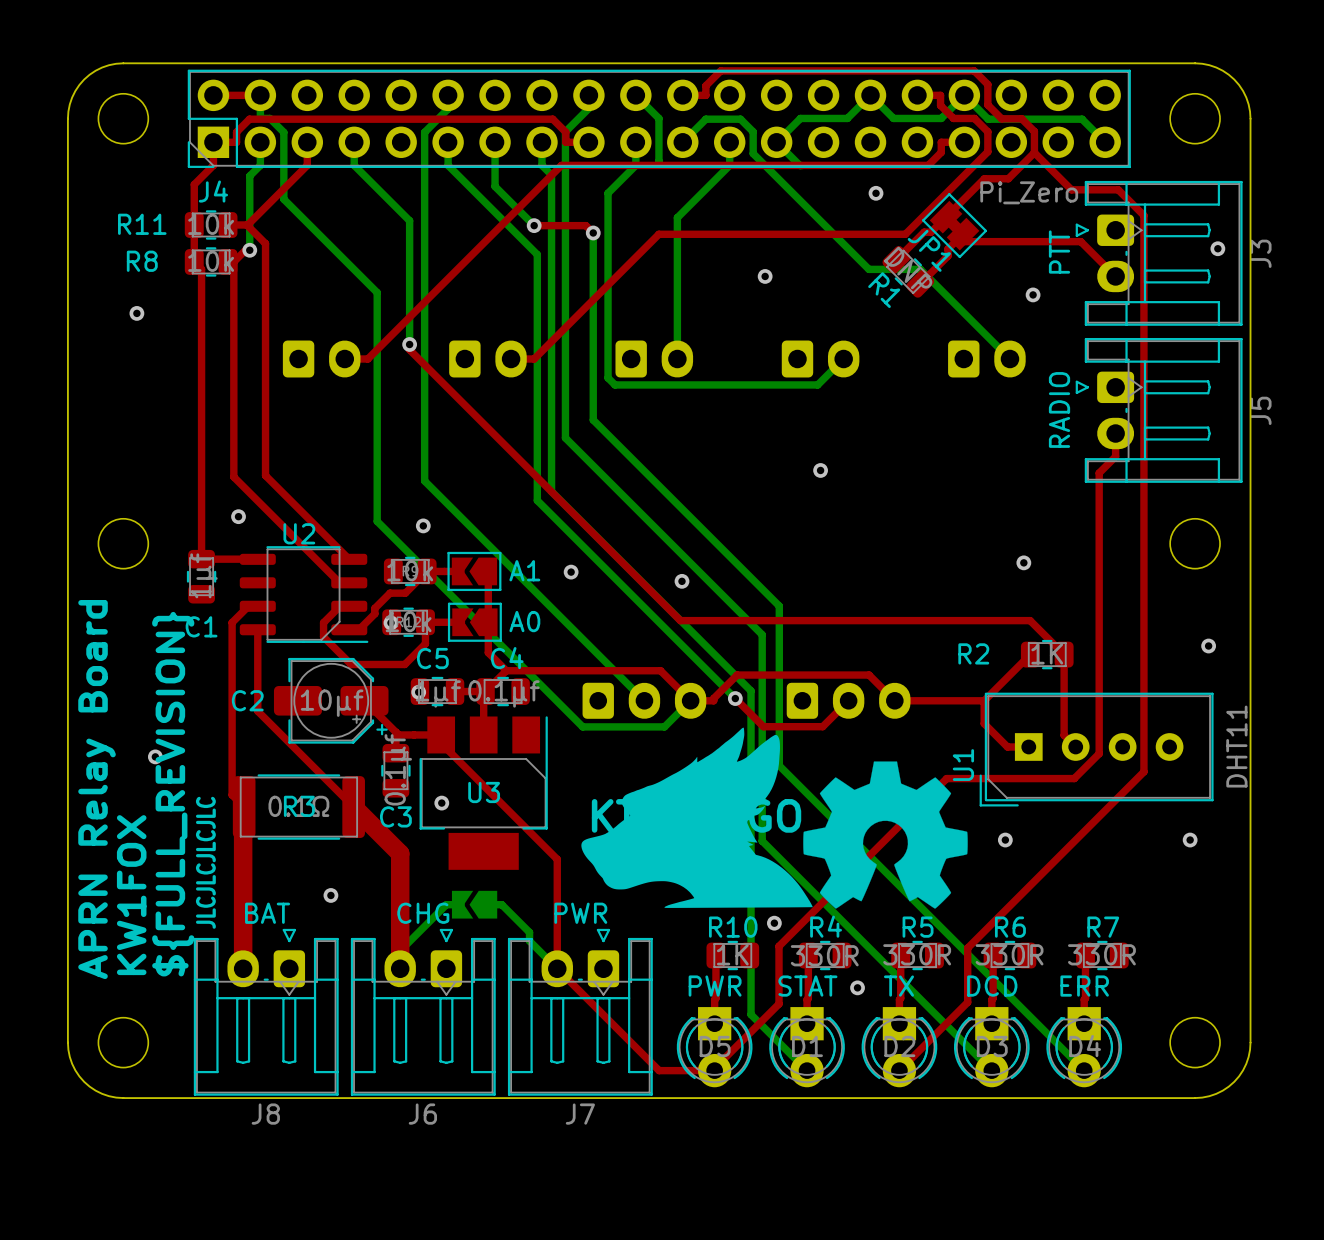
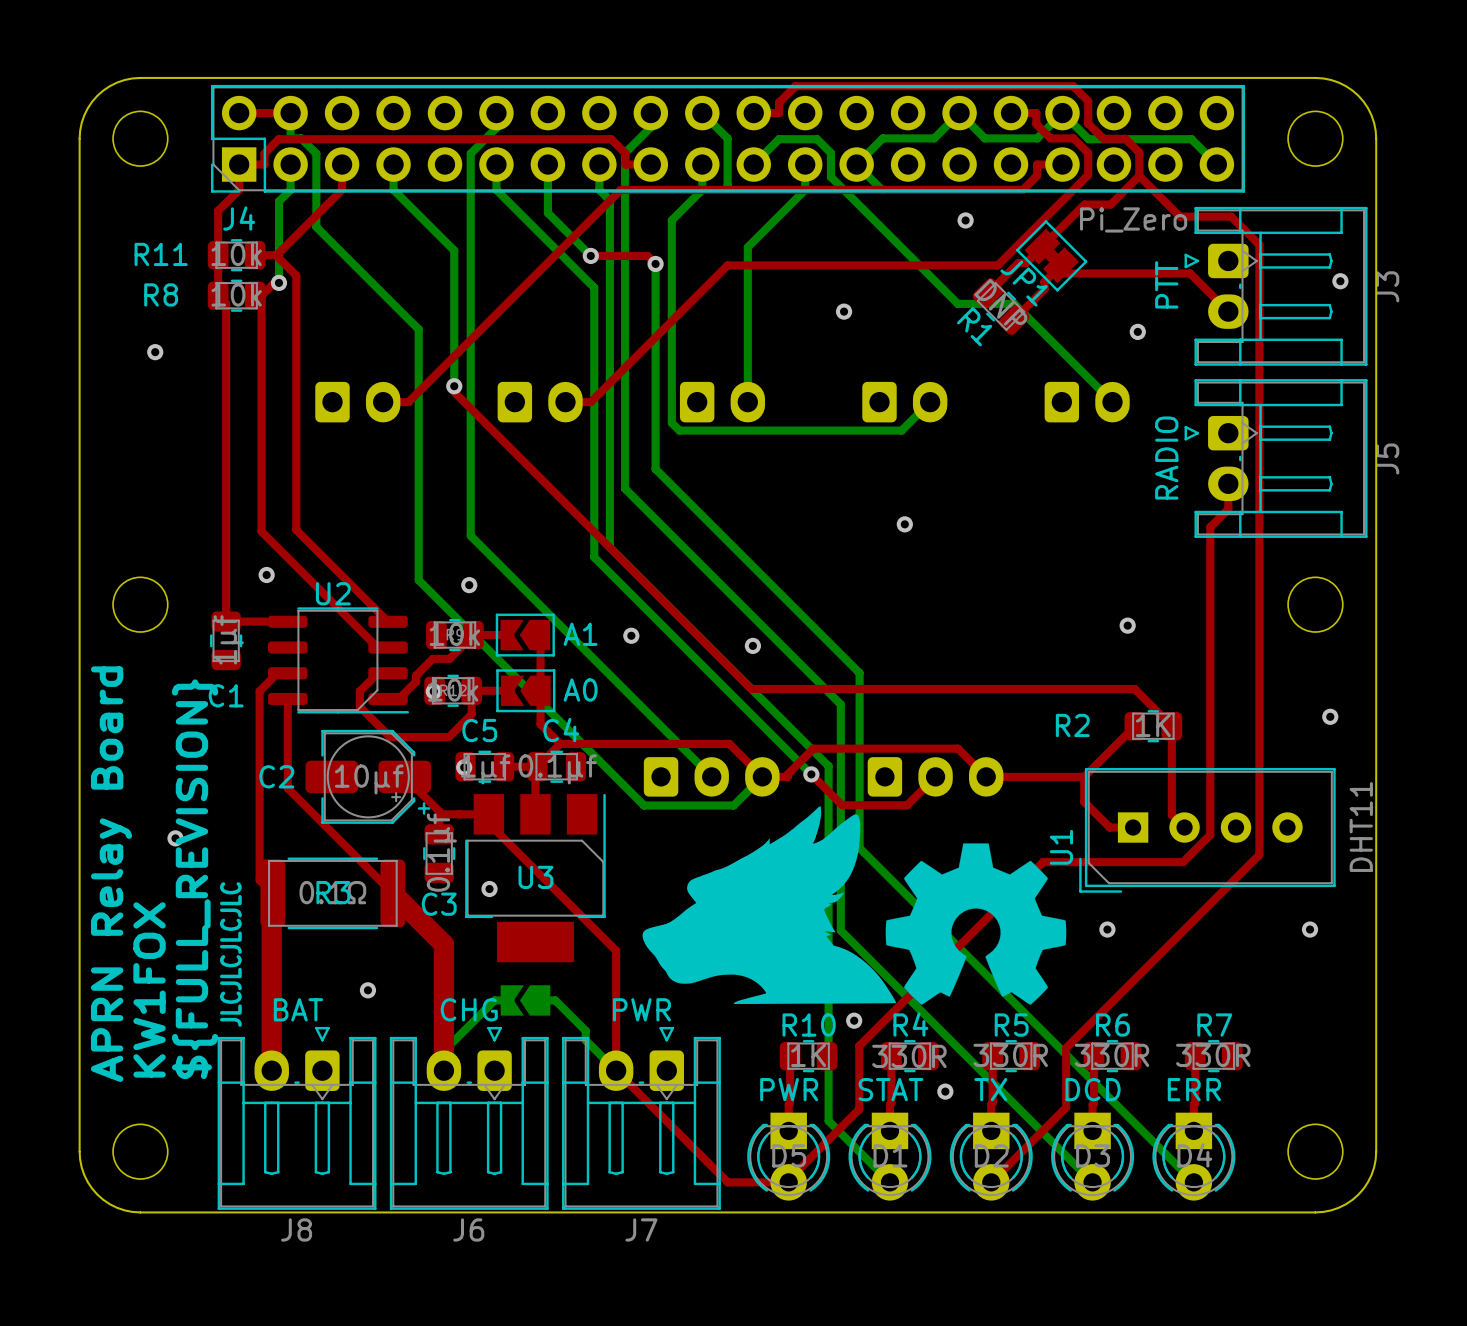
drawing: none -> [642, 806, 897, 1005]
part: (697, 817) -> none

